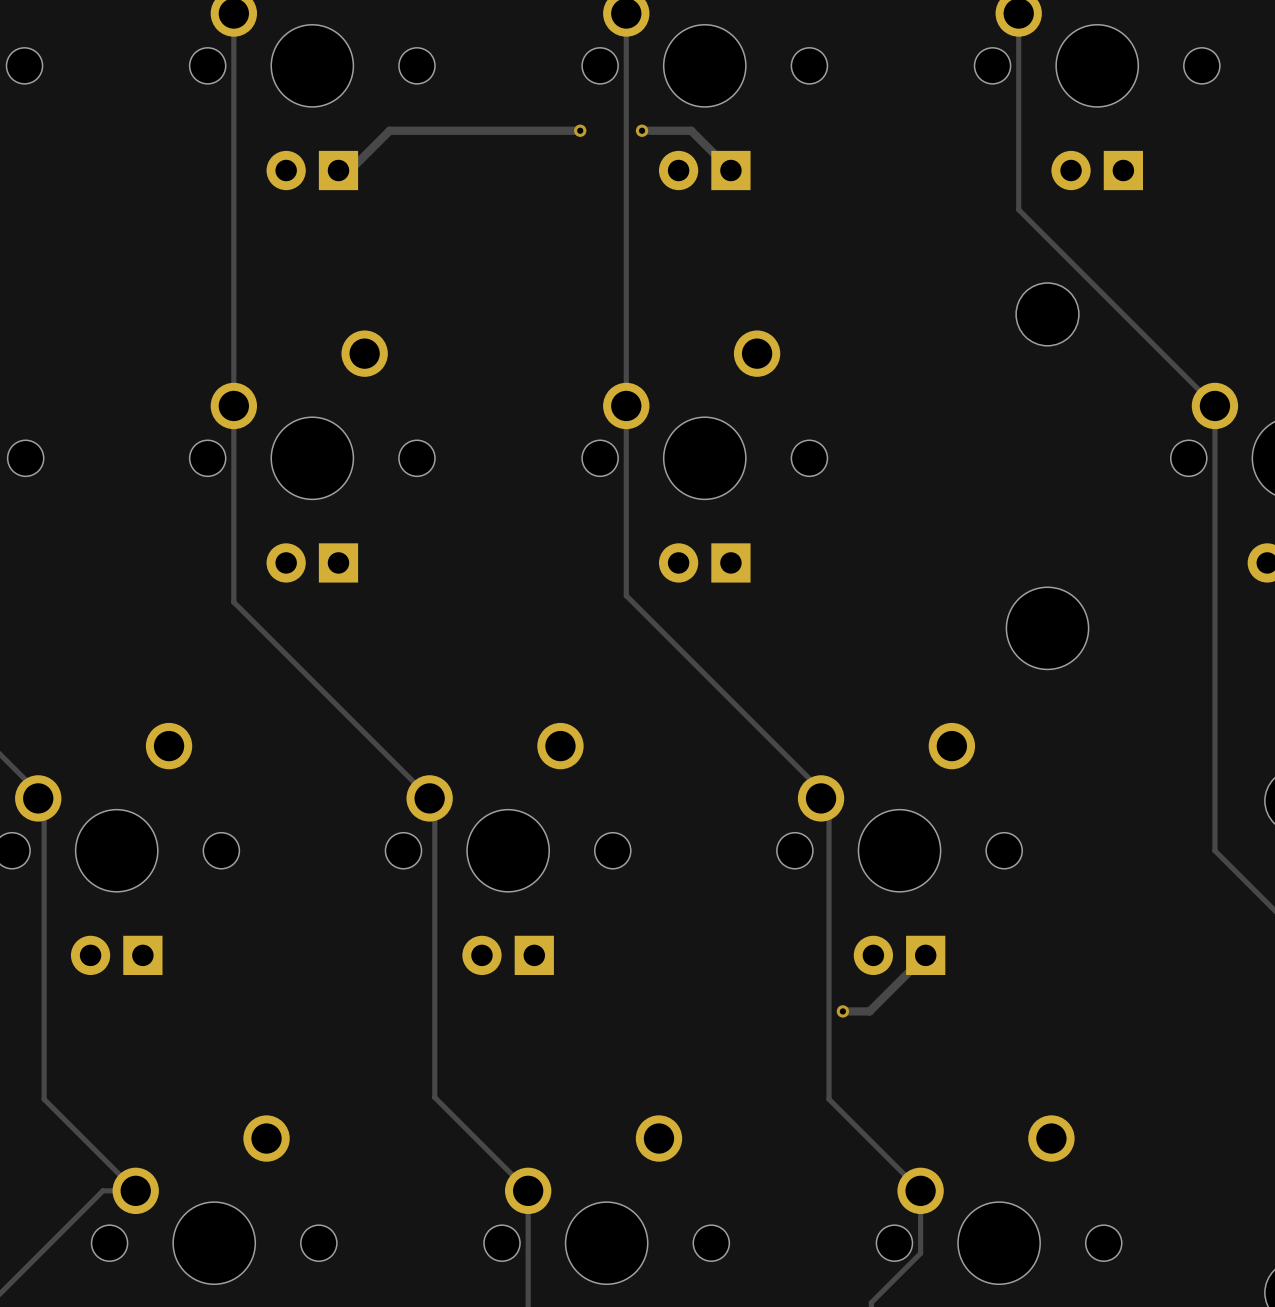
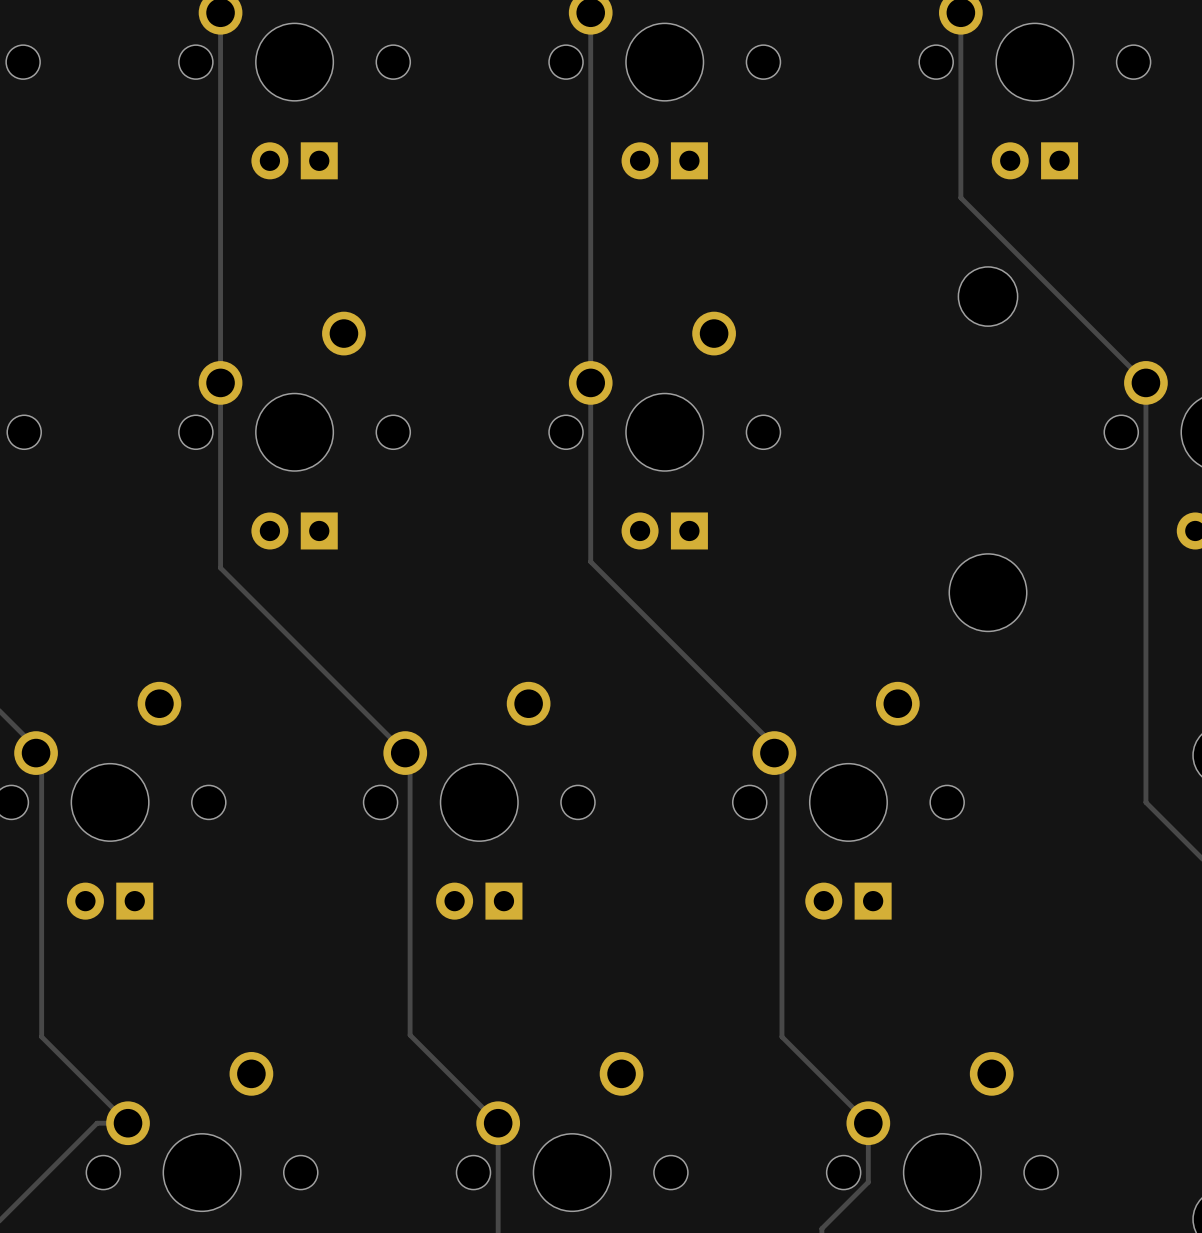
track: (580, 130) (389, 130) (349, 170) (338, 170) -> none
via: (580, 130) -> none
track: (642, 130) (691, 130) (730, 170) -> none
via: (642, 130) -> none
track: (925, 955) (869, 1011) (842, 1011) -> none
via: (842, 1011) -> none

